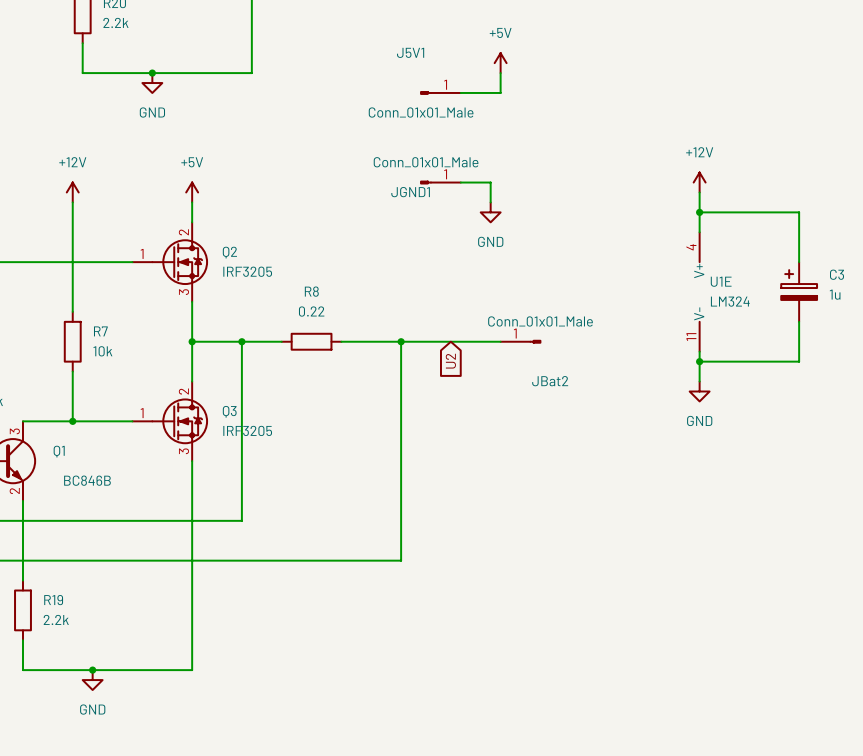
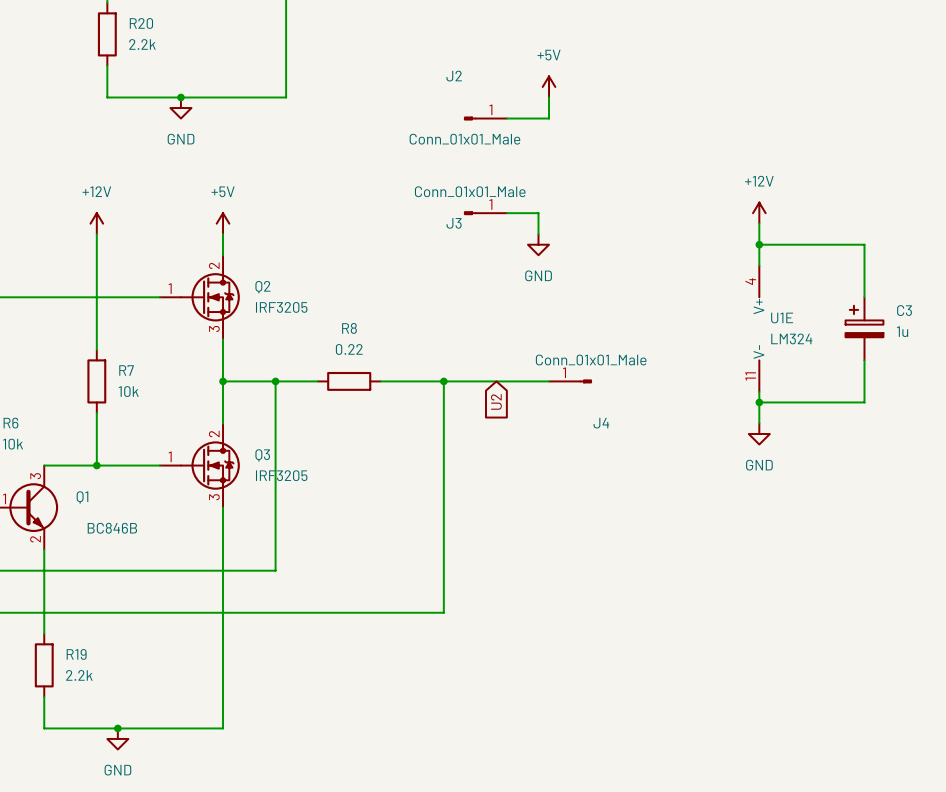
J5V1 name: J5V1 (410, 52) -> J2 (454, 76)
JGND1 name: JGND1 (410, 192) -> J3 (454, 223)
JBat2 name: JBat2 (550, 381) -> J4 (601, 423)

